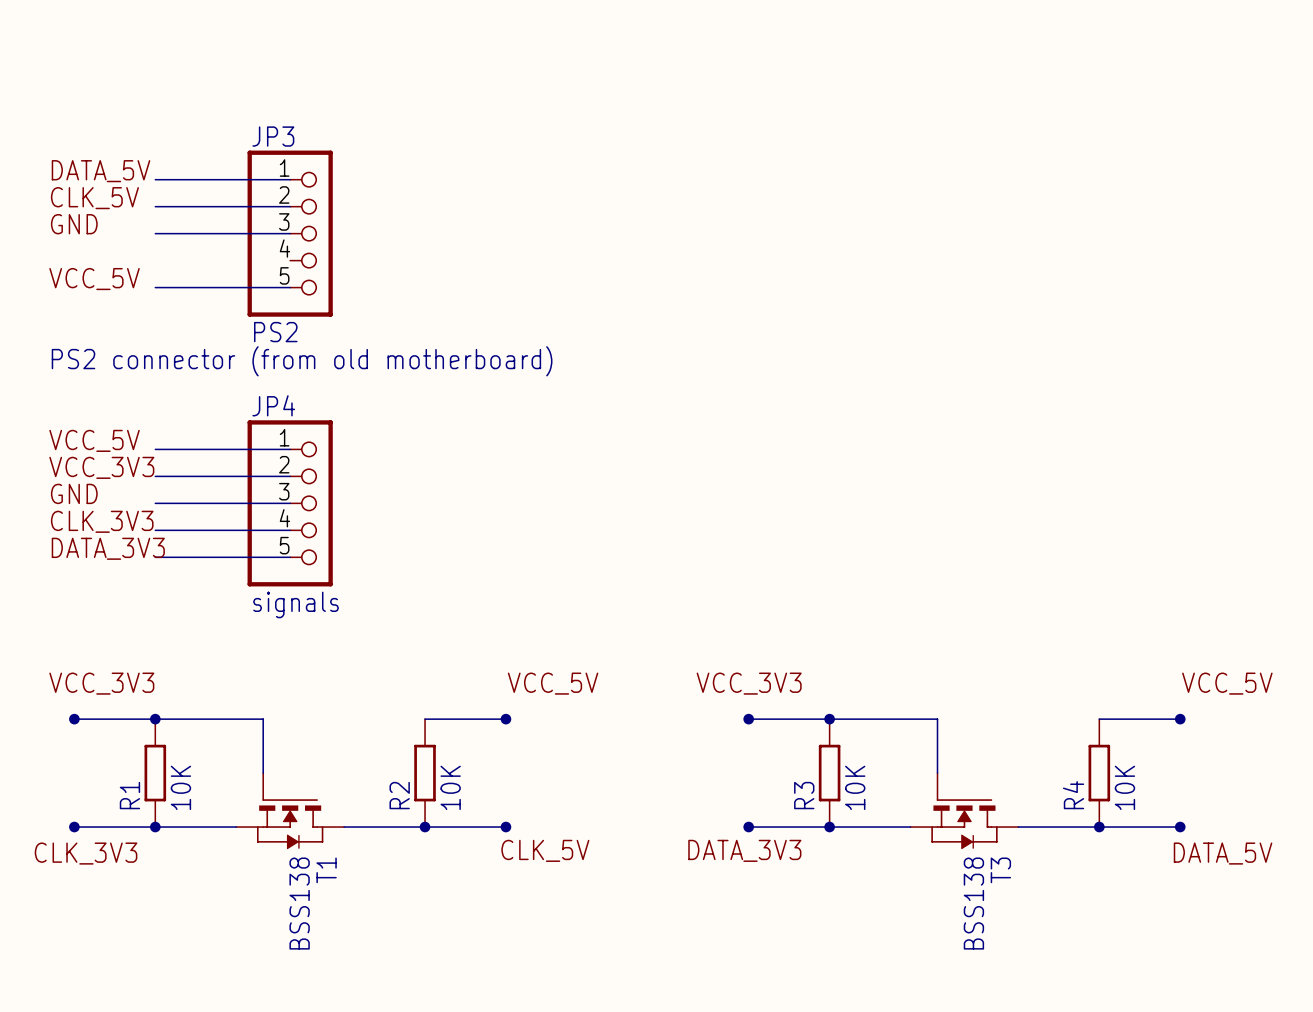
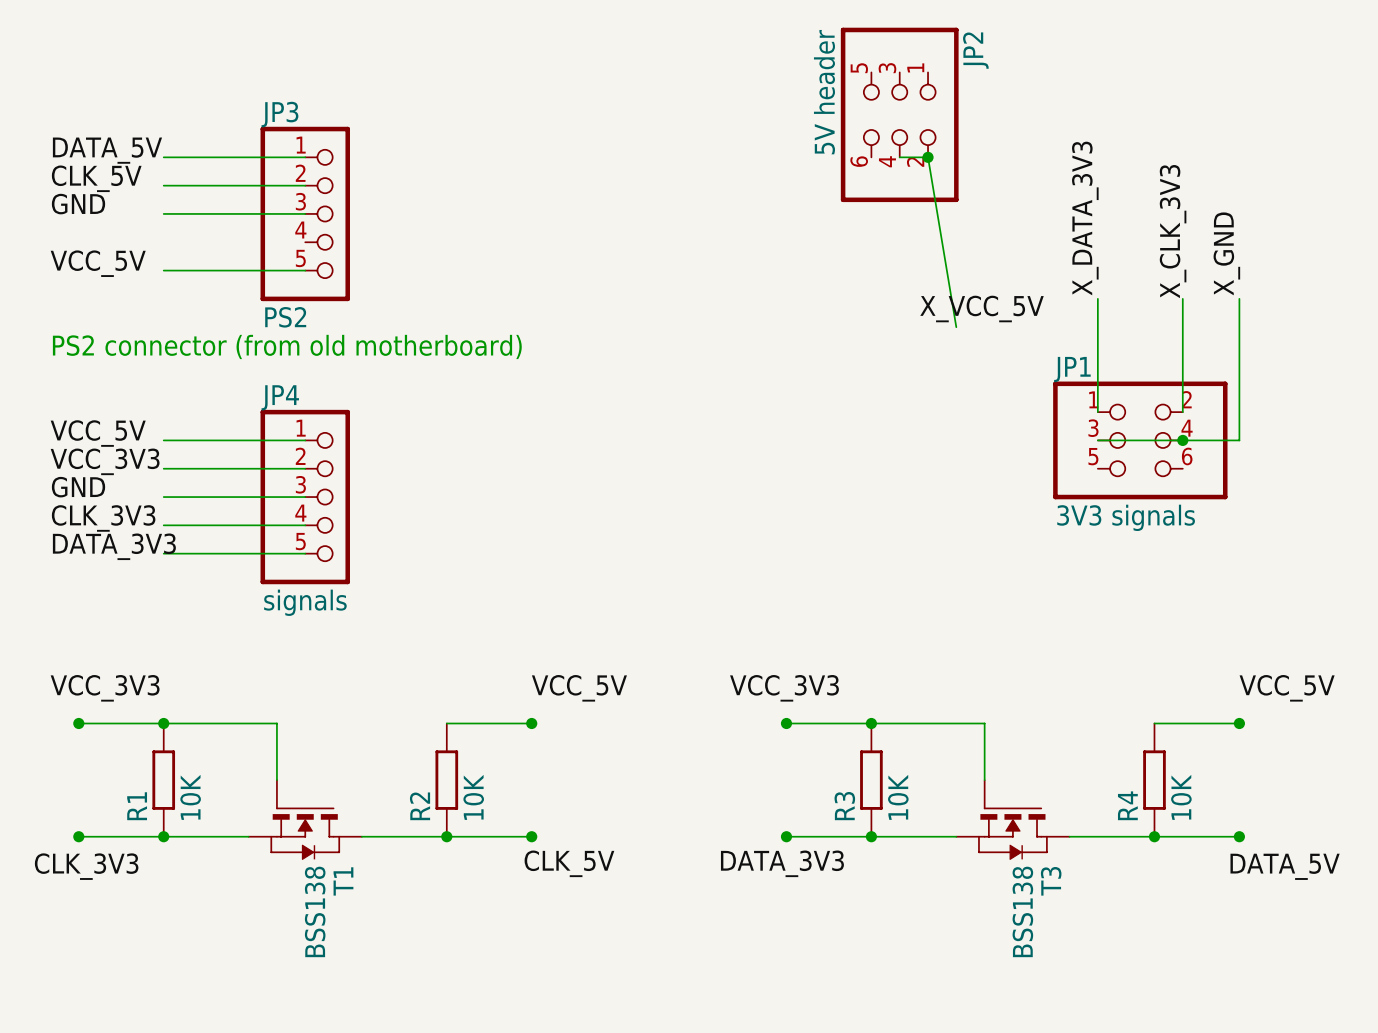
JP2: none -> 5V header (899, 114)
wire: none -> (899, 157) (928, 157) (956, 327)
junction: none -> (928, 157)
label: none -> X_DATA_3V3 (1085, 218)
label: none -> X_CLK_3V3 (1173, 231)
label: none -> X_GND (1226, 253)
wire: none -> (1097, 298) (1097, 412)
wire: none -> (1182, 298) (1182, 412)
wire: none -> (1239, 298) (1239, 440) (1097, 440)
label: none -> X_VCC_5V (982, 308)
JP1: none -> 3V3 signals (1140, 440)
junction: none -> (1182, 440)

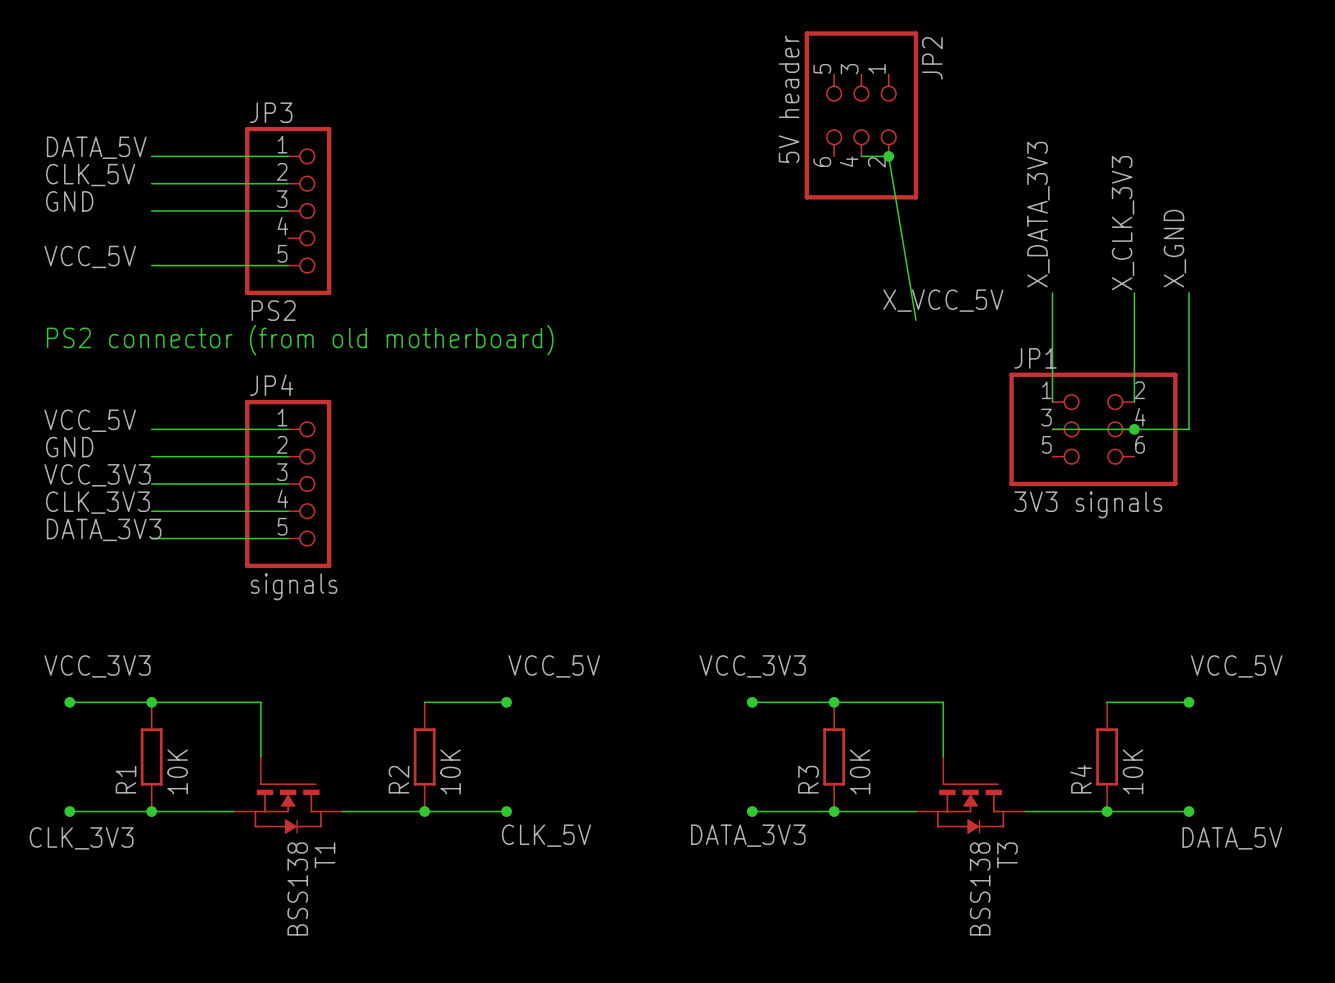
label: VCC_3V3 (105, 461) -> GND (69, 447)
label: GND (78, 487) -> VCC_3V3 (97, 475)

